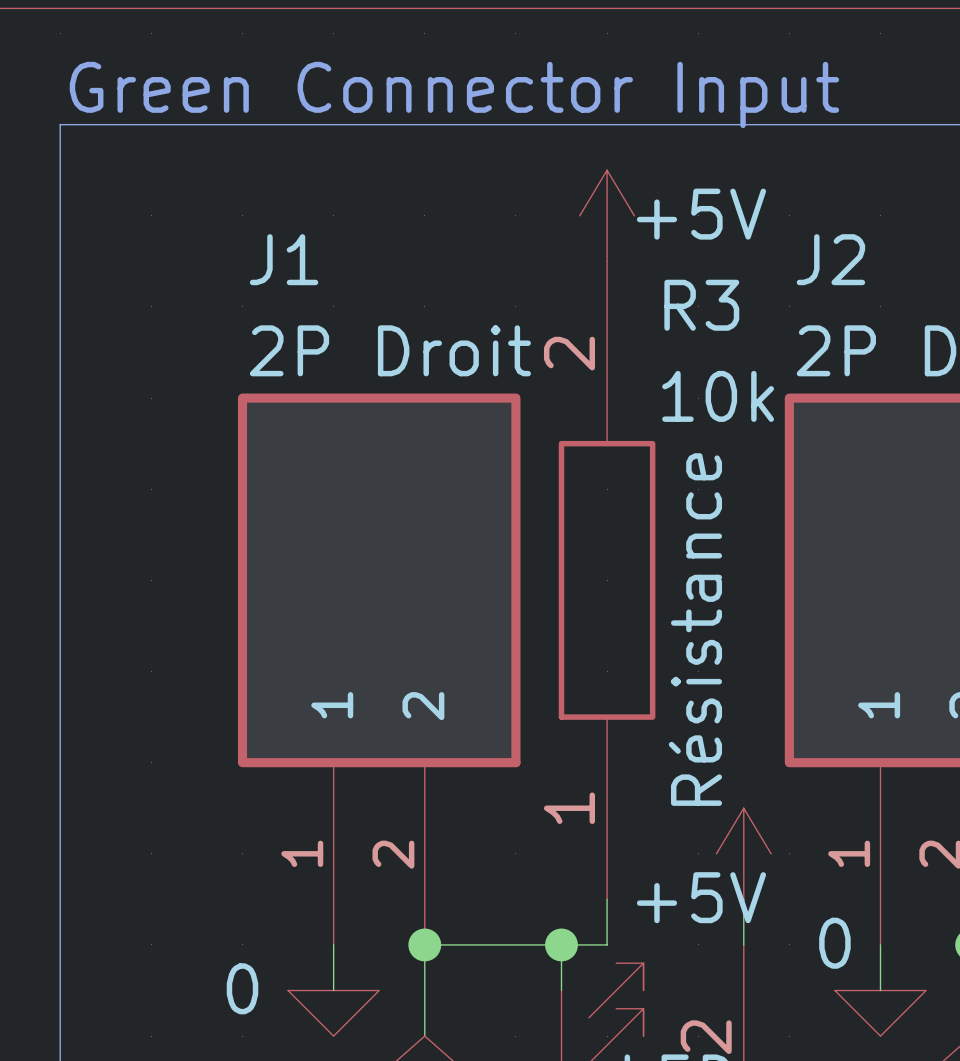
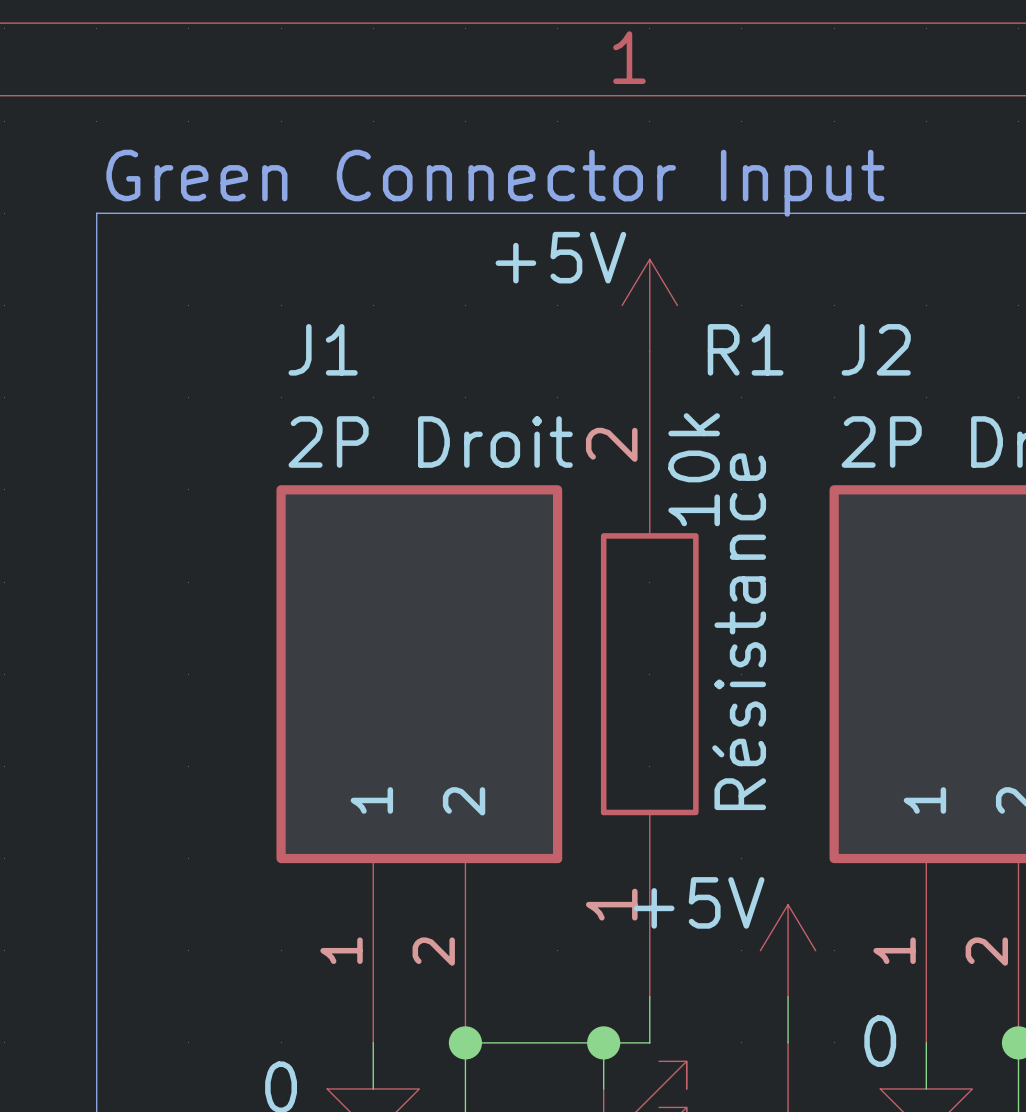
power symbol text position: +5V (701, 214) -> +5V (560, 257)
R3 name: R3 (701, 305) -> R1 (745, 349)
R3 value: none -> 10k (694, 469)
R3 text: 10k (718, 396) -> none
R3 text position: Résistance (695, 629) -> Résistance (739, 631)
power symbol text position: +5V (701, 897) -> +5V (699, 902)

